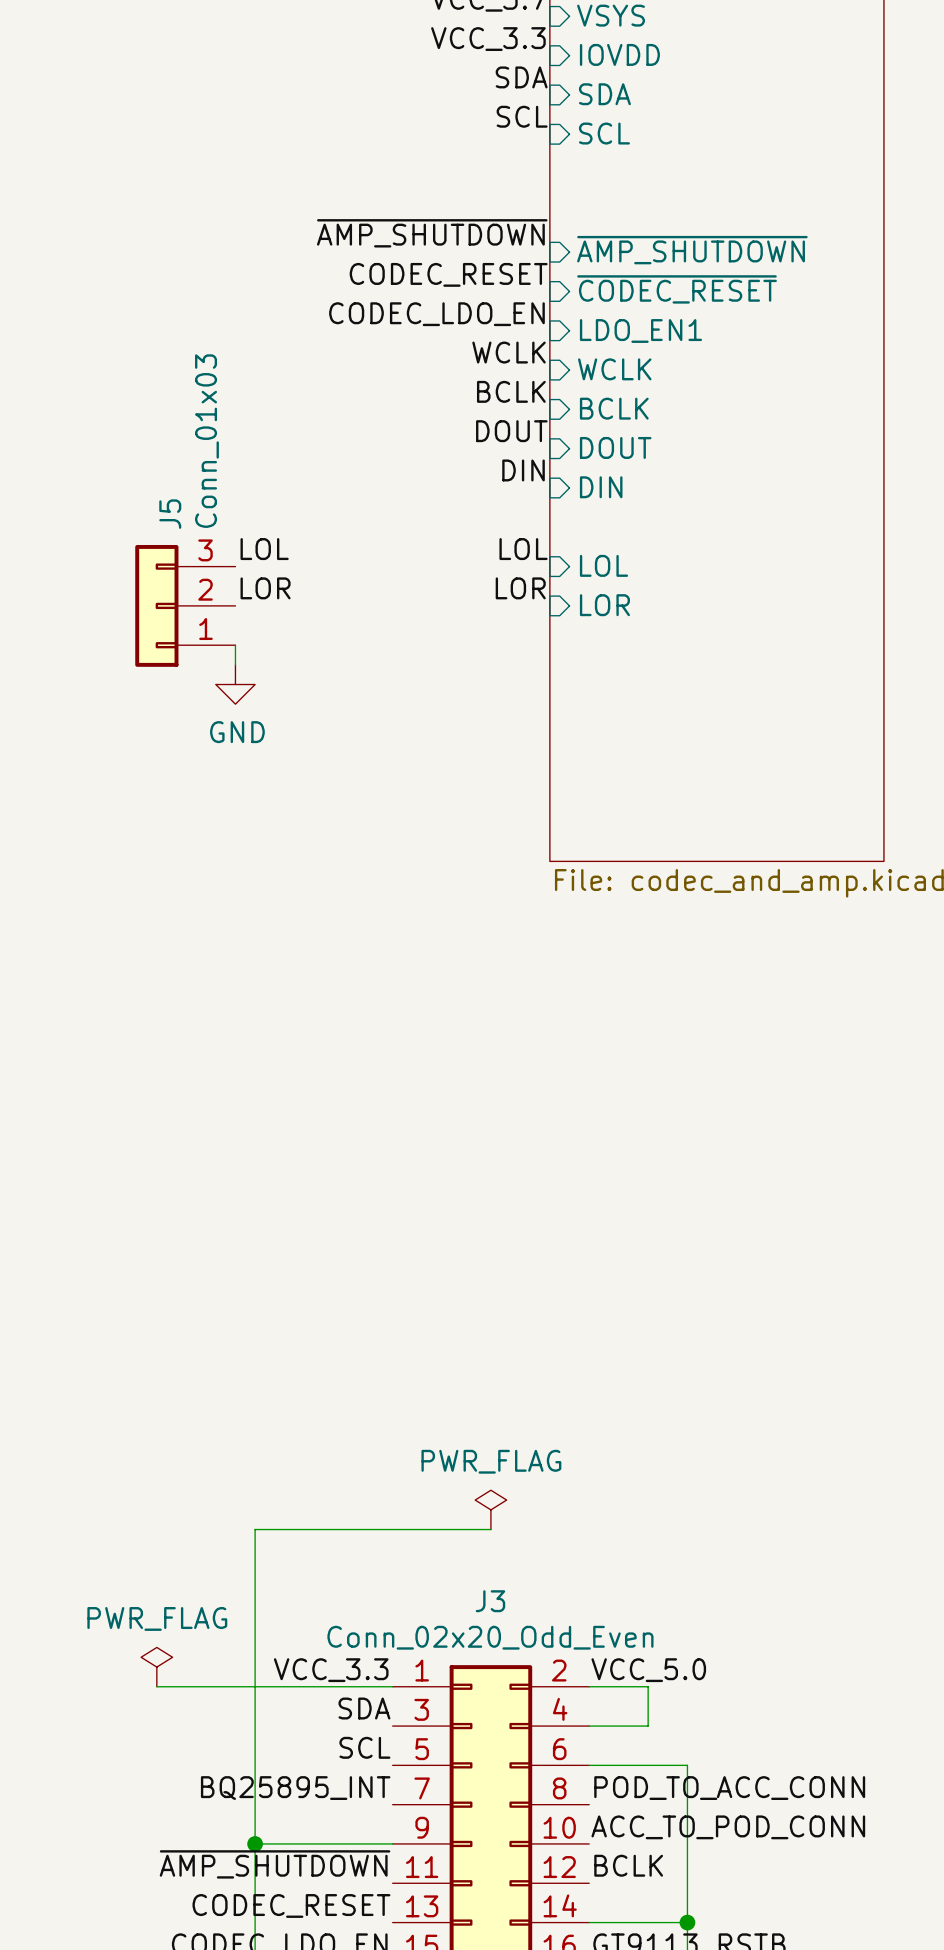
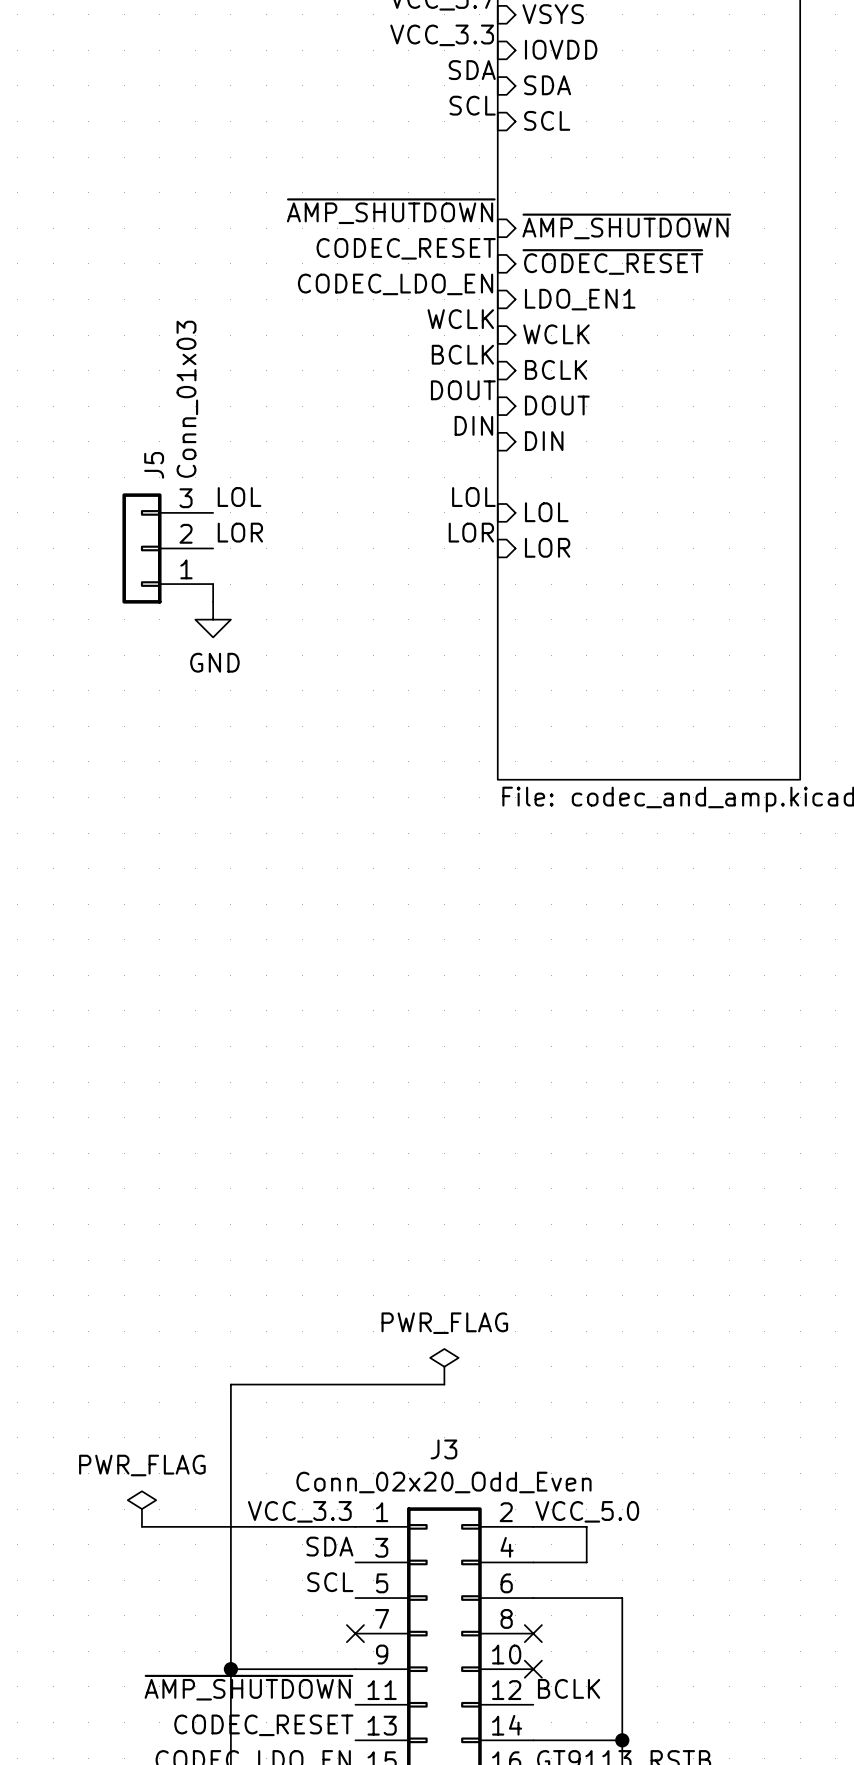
label: BQ25895_INT (295, 1788) -> none
label: POD_TO_ACC_CONN (729, 1788) -> none
no-connect mark: none -> (355, 1633)
no-connect mark: none -> (533, 1633)
label: ACC_TO_POD_CONN (728, 1827) -> none
no-connect mark: none -> (533, 1669)

